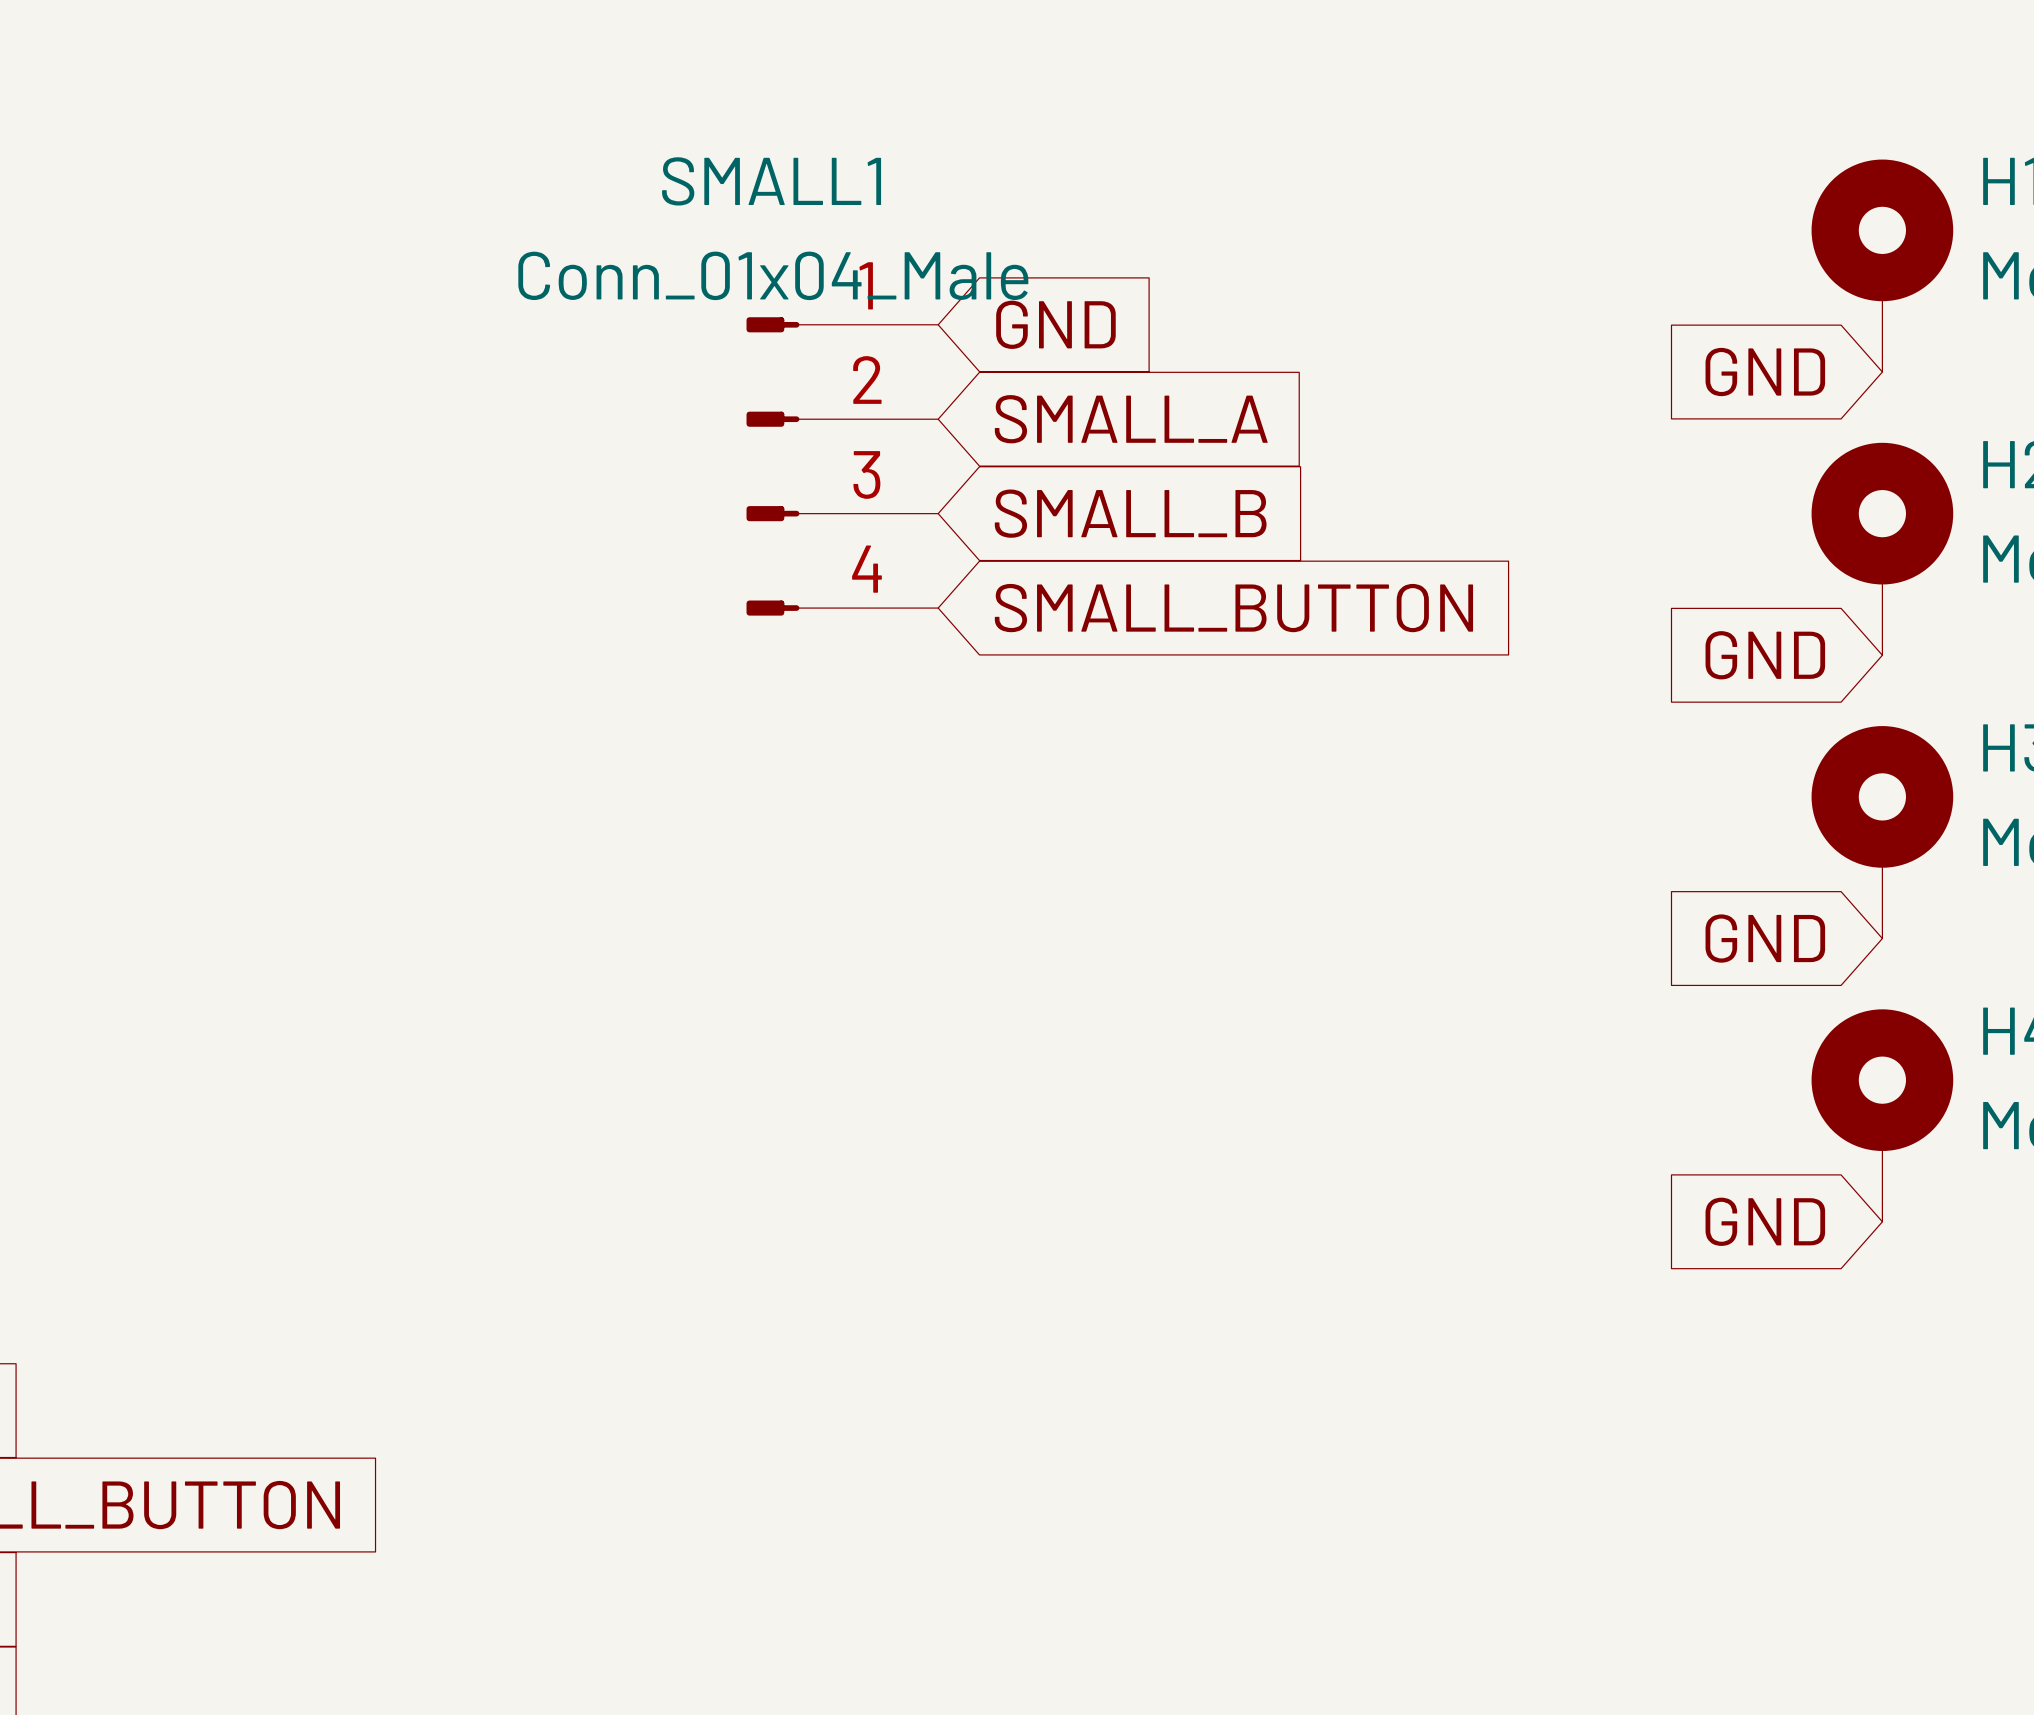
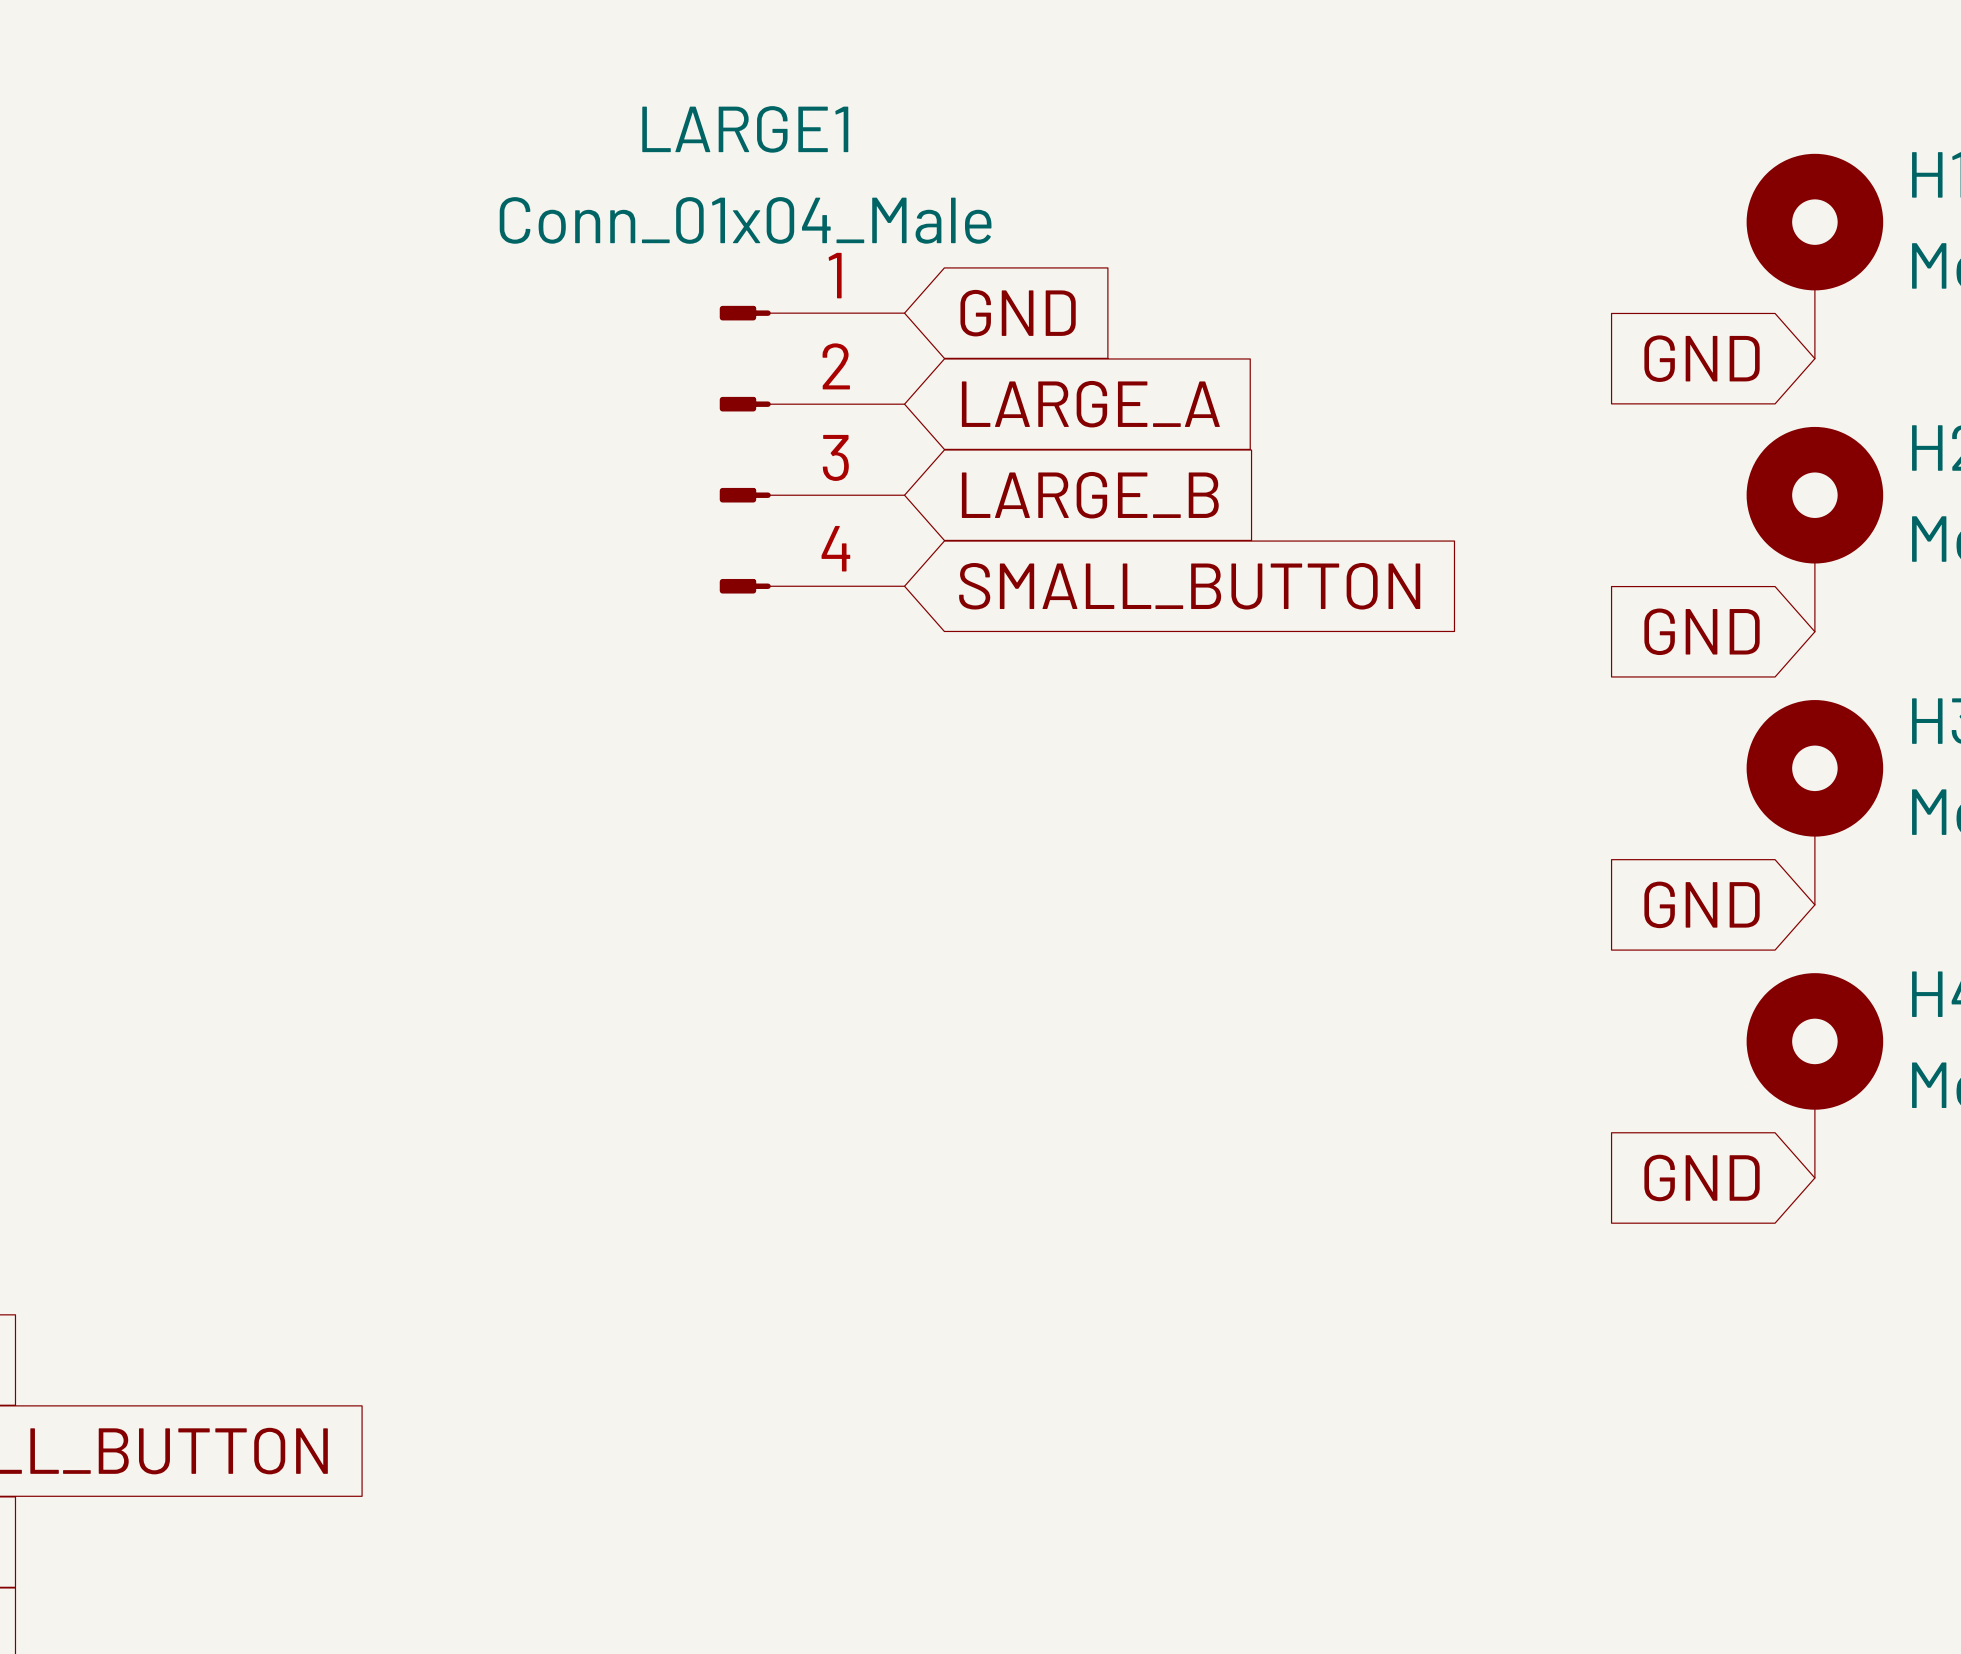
SMALL1 name: SMALL1 (771, 181) -> LARGE1 (745, 129)
SMALL1 value position: Conn_01x04_Male (773, 275) -> Conn_01x04_Male (745, 220)
global label: SMALL_A (1131, 419) -> LARGE_A (1090, 404)
global label: SMALL_B (1130, 513) -> LARGE_B (1090, 495)

